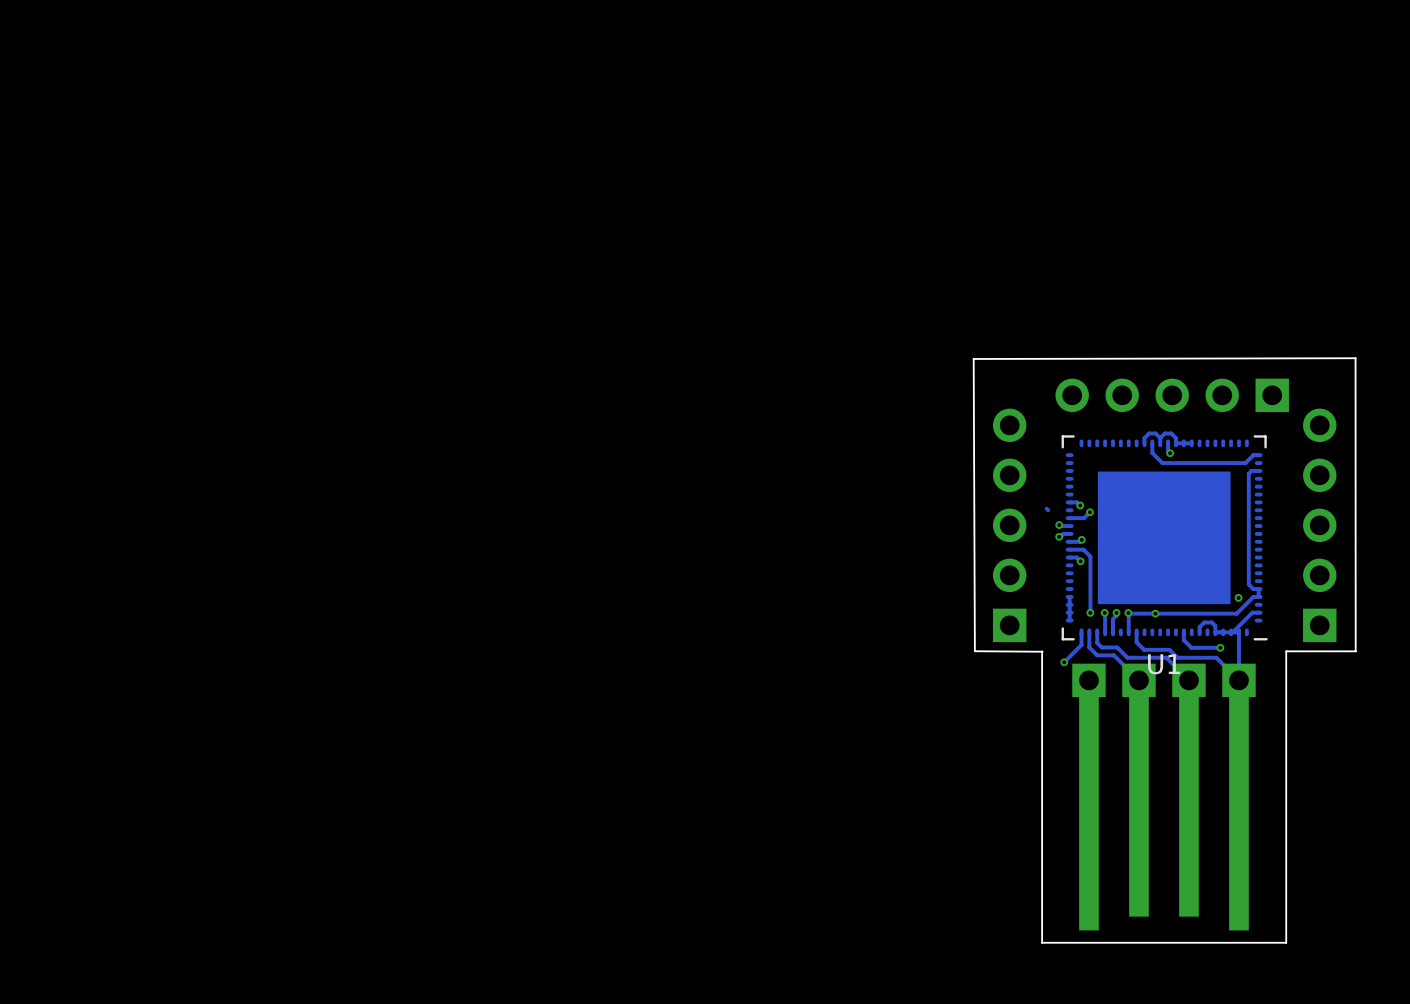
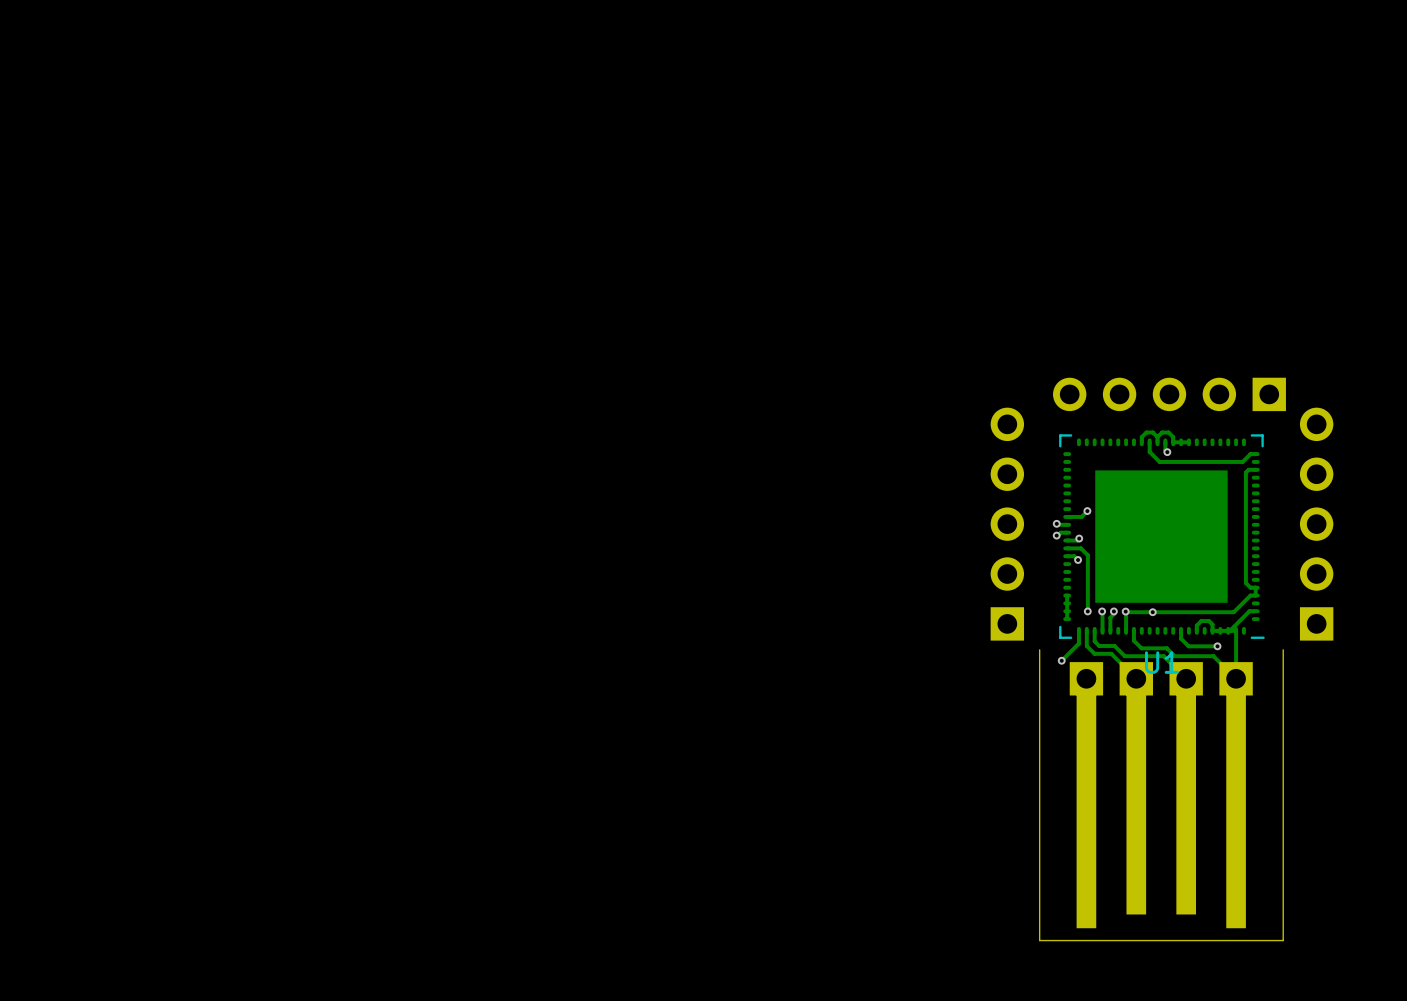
track: (1069, 502) (1077, 502) (1080, 505) -> none
via: (1080, 505) -> none
track: (1046, 508) (1048, 510) -> none
via: (1238, 597) -> none
board edge: (1286, 651) (1355, 651) (1355, 358) (973, 358) (974, 651) (1042, 651) -> none

